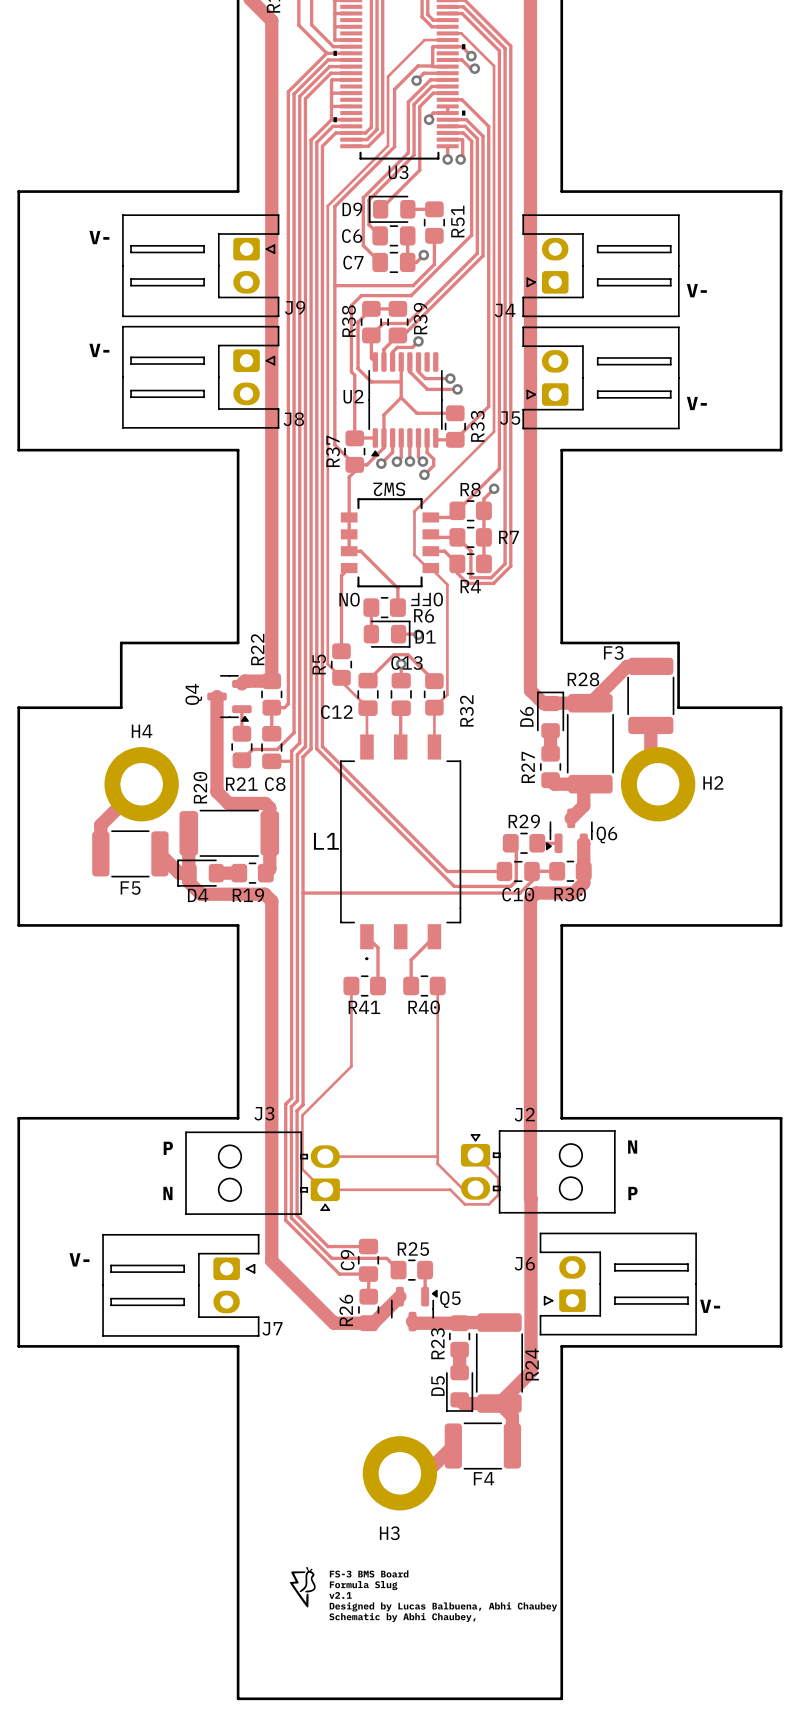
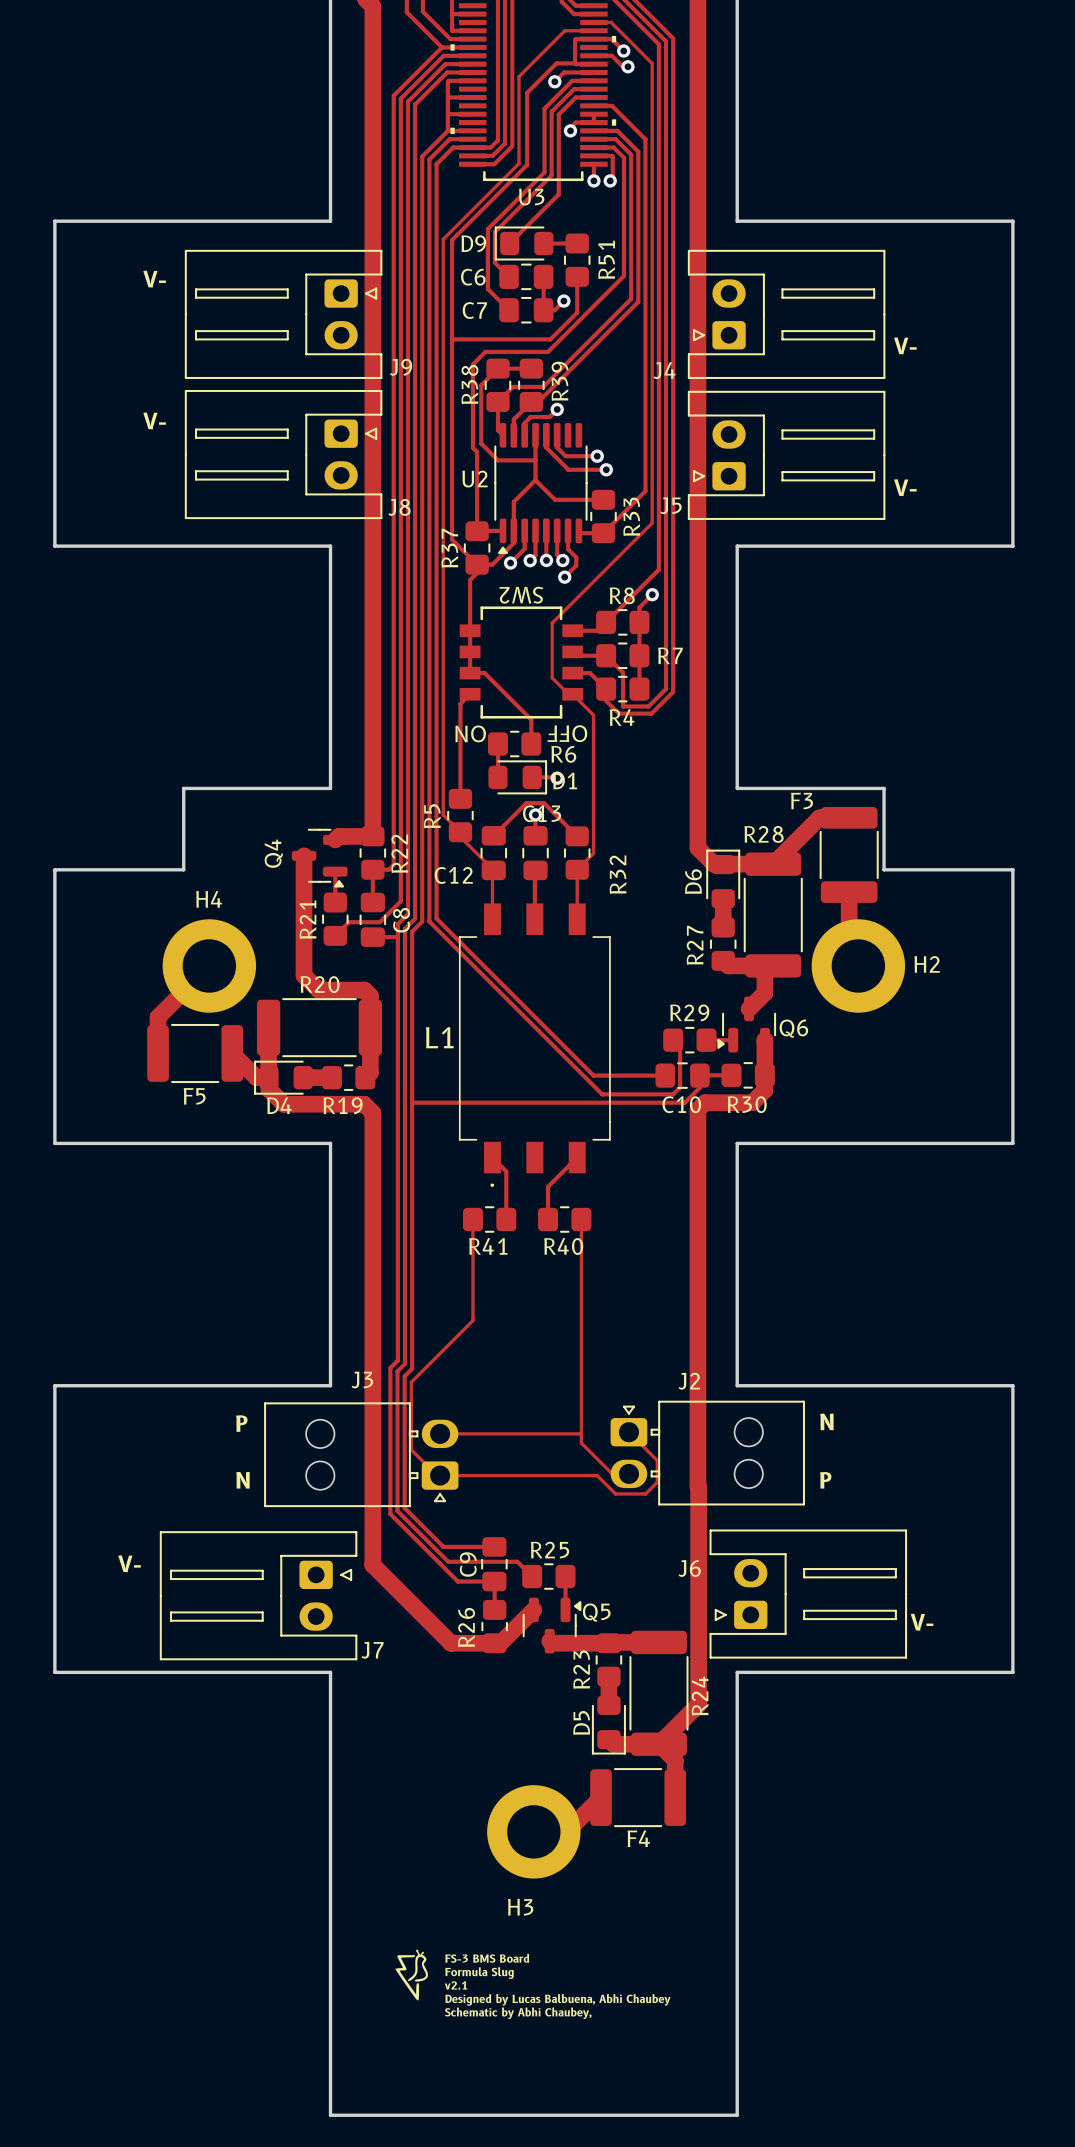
R22 name position: R22 (257, 649) -> R22 (399, 853)
R21 name rotation: 0° (241, 784) -> 90° counterclockwise (308, 919)
C8 name rotation: 0° (275, 784) -> 90° counterclockwise (401, 920)
C8 name position: C8 (275, 784) -> C8 (401, 920)
R20 name rotation: 0° (200, 787) -> 90° clockwise (320, 984)

